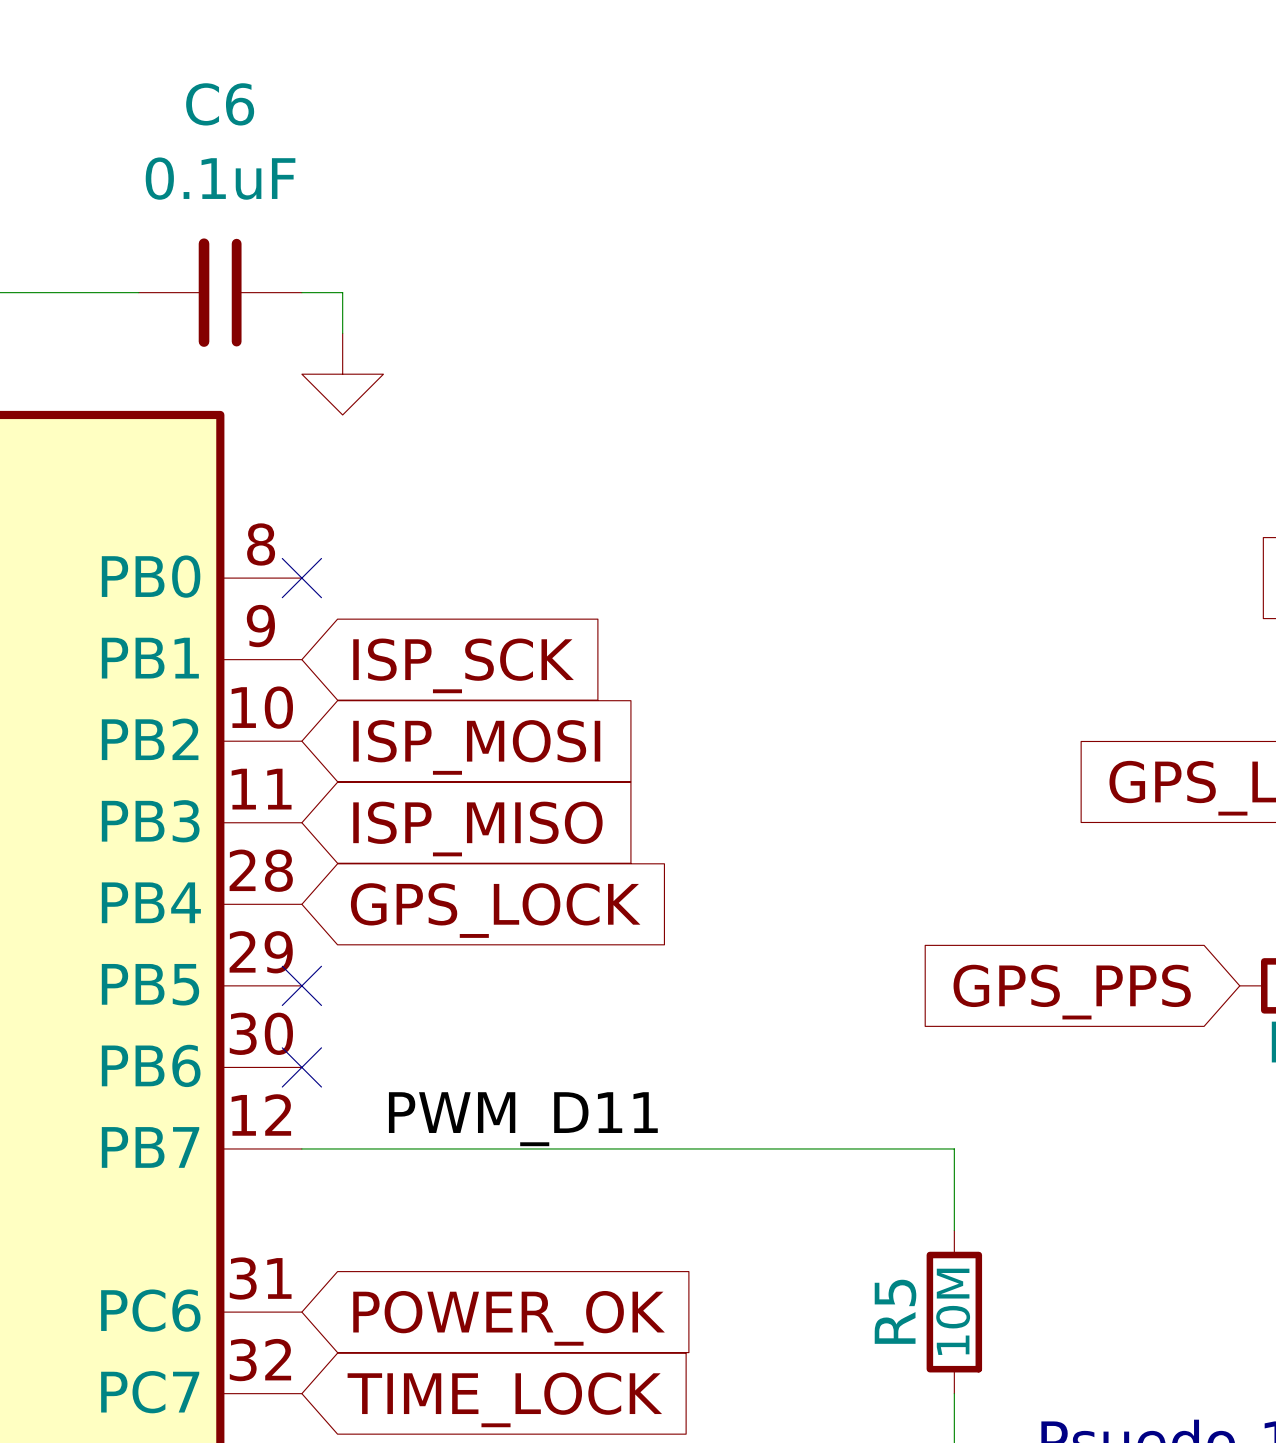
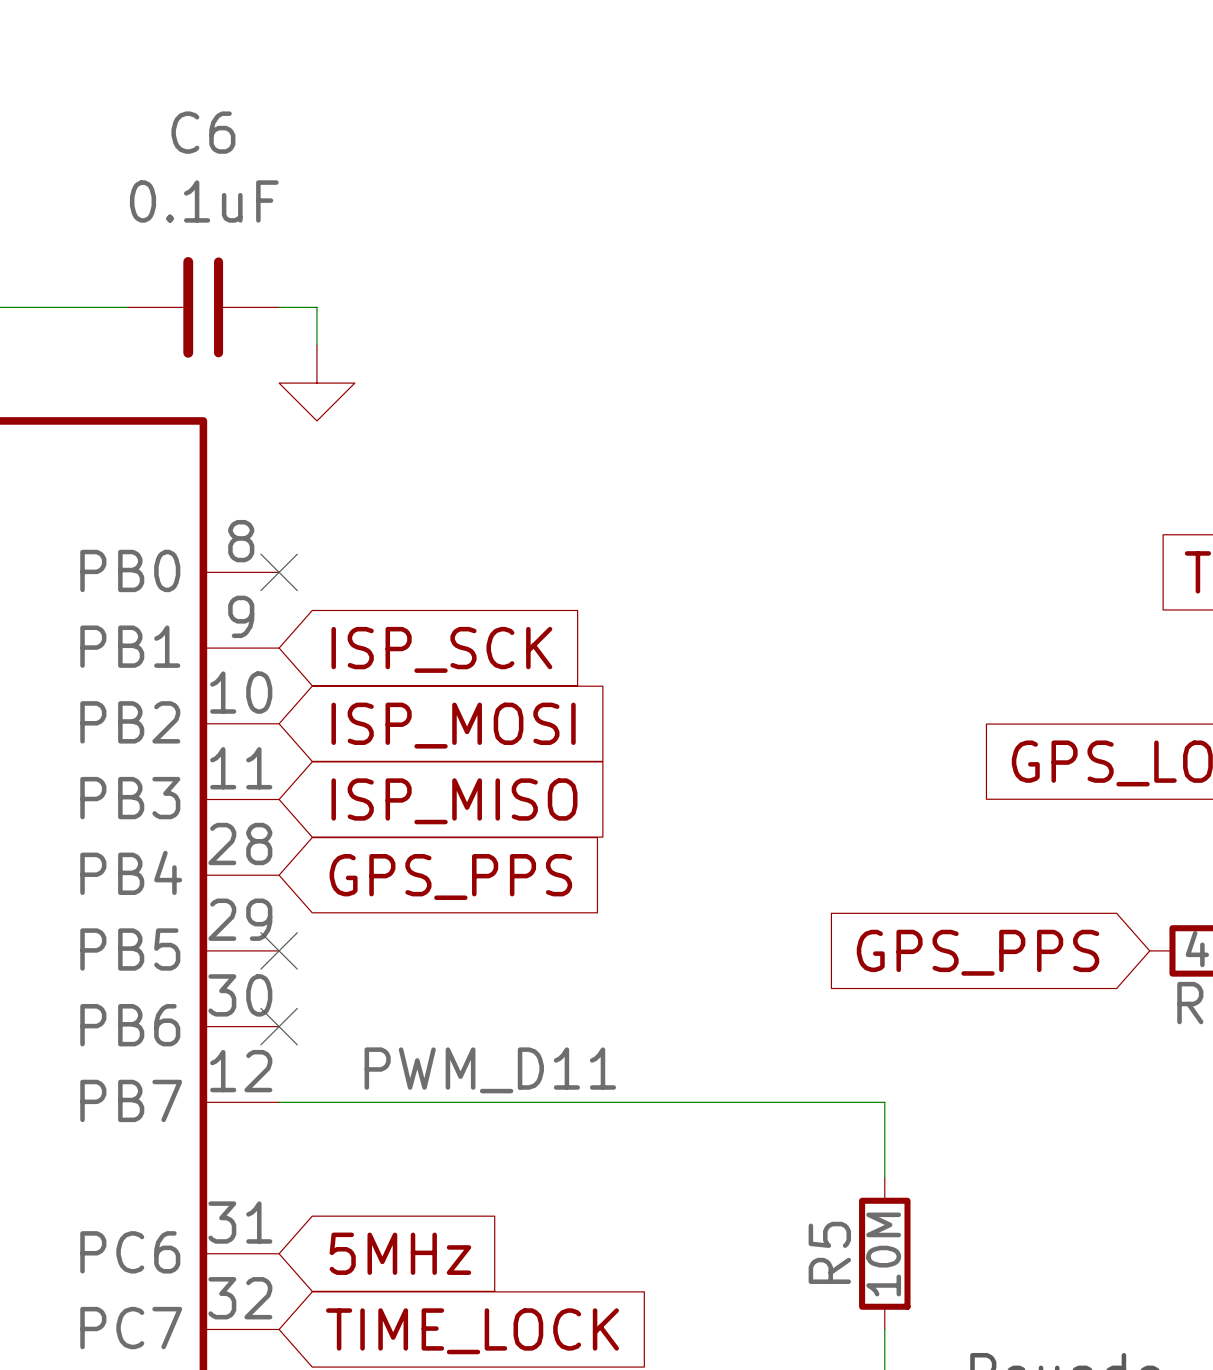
global label: GPS_LOCK (495, 910) -> GPS_PPS (450, 877)
global label: POWER_OK (509, 1318) -> 5MHz (400, 1253)

